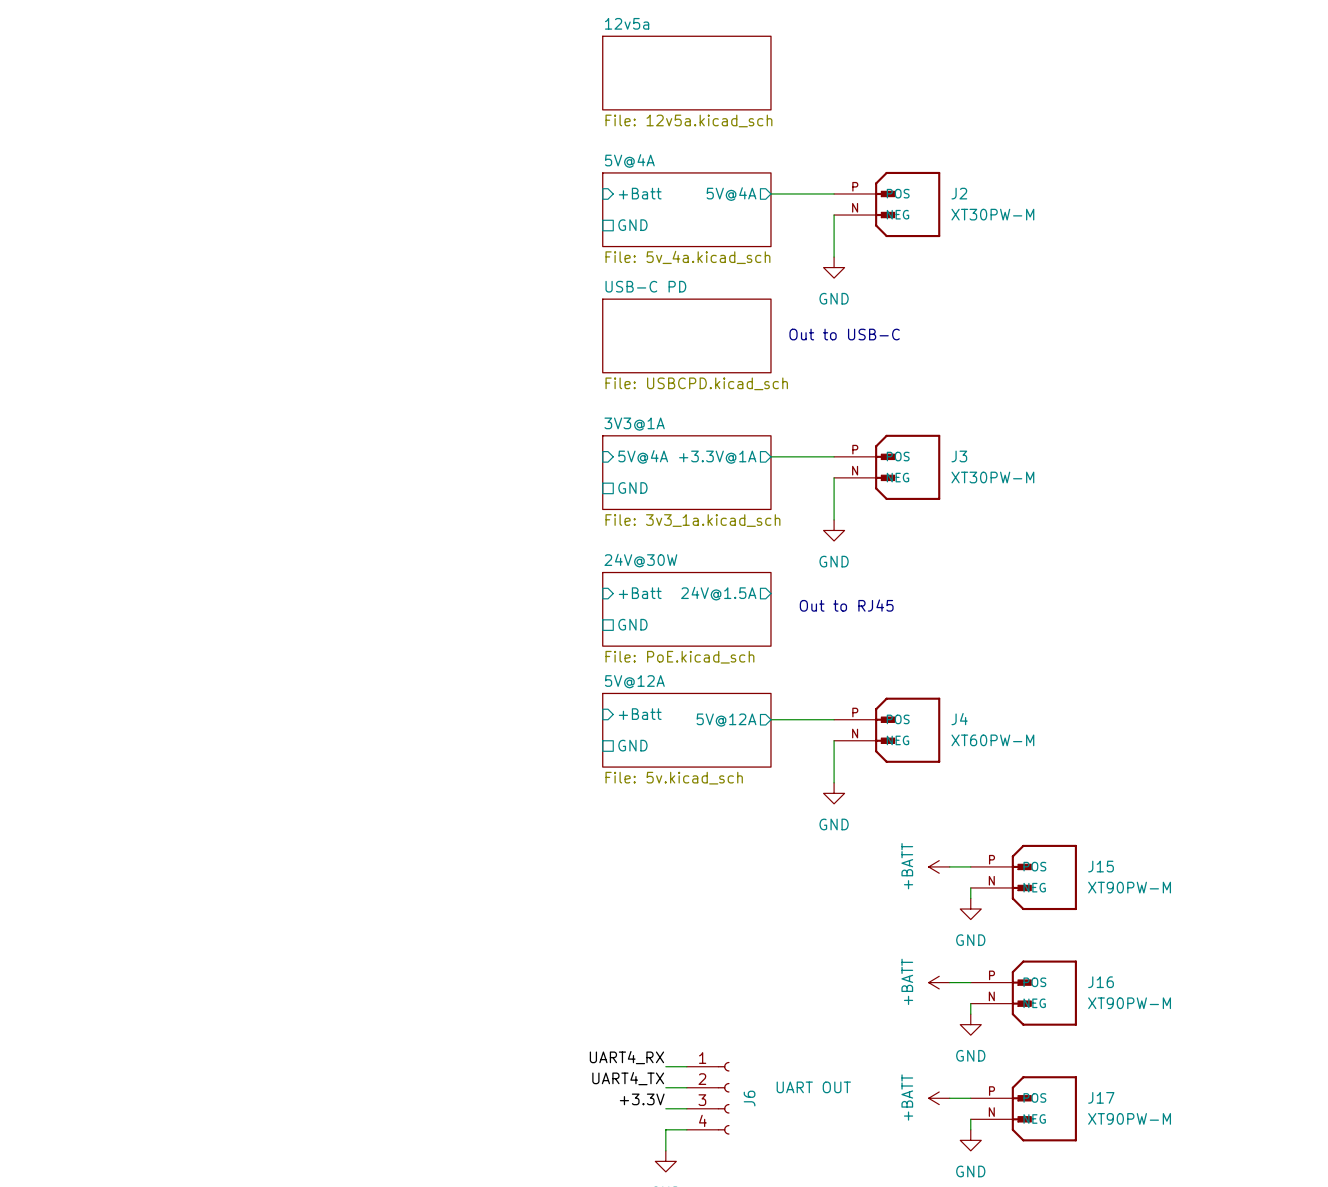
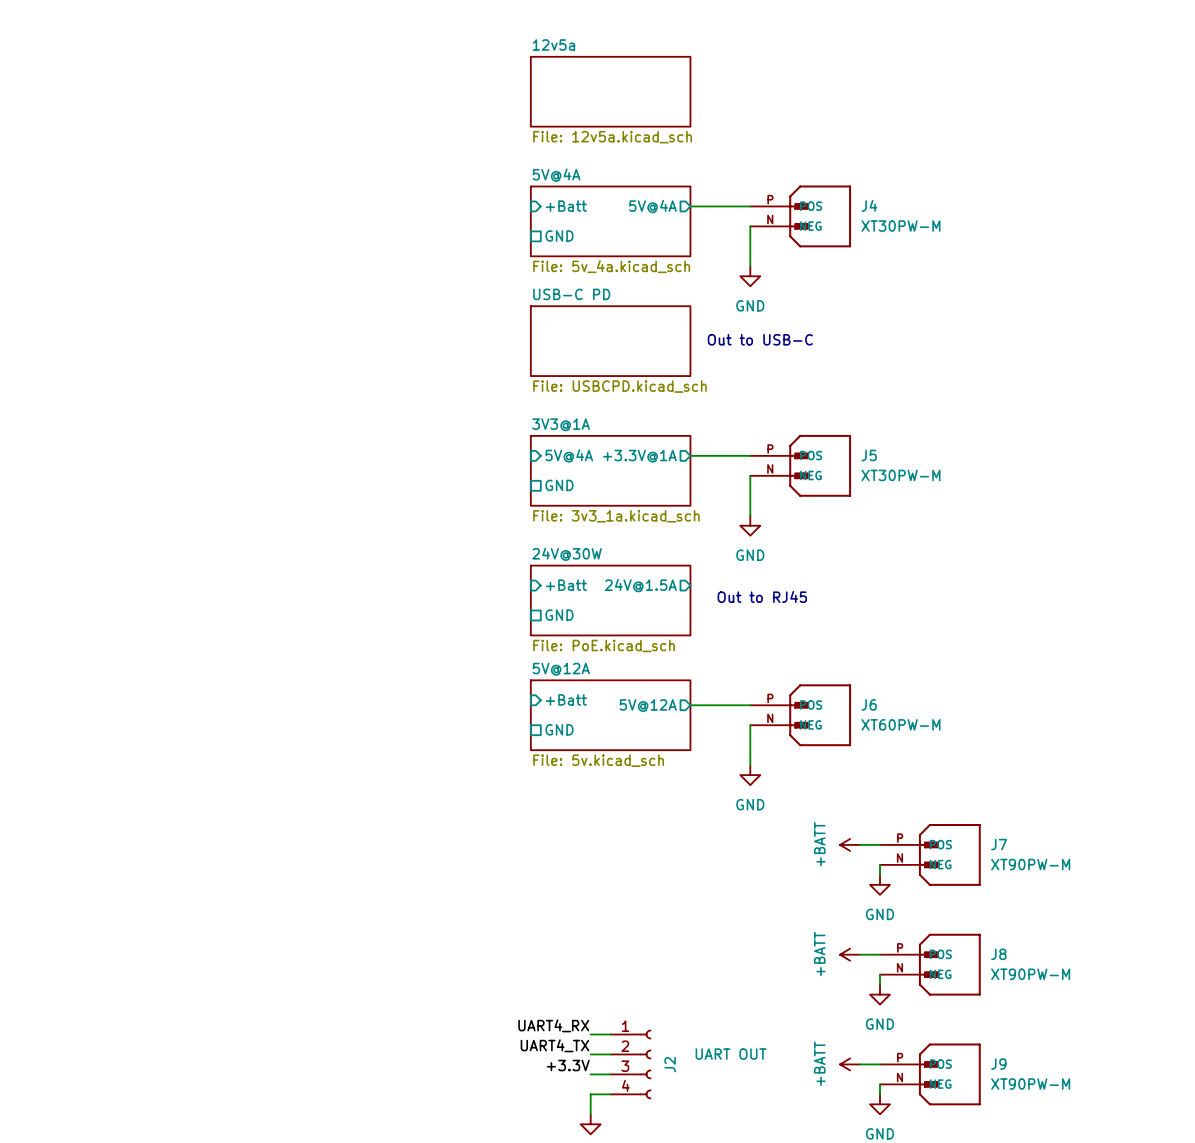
J2 name: J2 (959, 193) -> J4 (869, 205)
J3 name: J3 (959, 456) -> J5 (869, 455)
J4 name: J4 (959, 719) -> J6 (869, 704)
J15 name: J15 (1101, 866) -> J7 (999, 844)
J16 name: J16 (1101, 982) -> J8 (998, 954)
J17 name: J17 (1101, 1097) -> J9 (998, 1064)
J6 name: J6 (749, 1098) -> J2 (670, 1064)

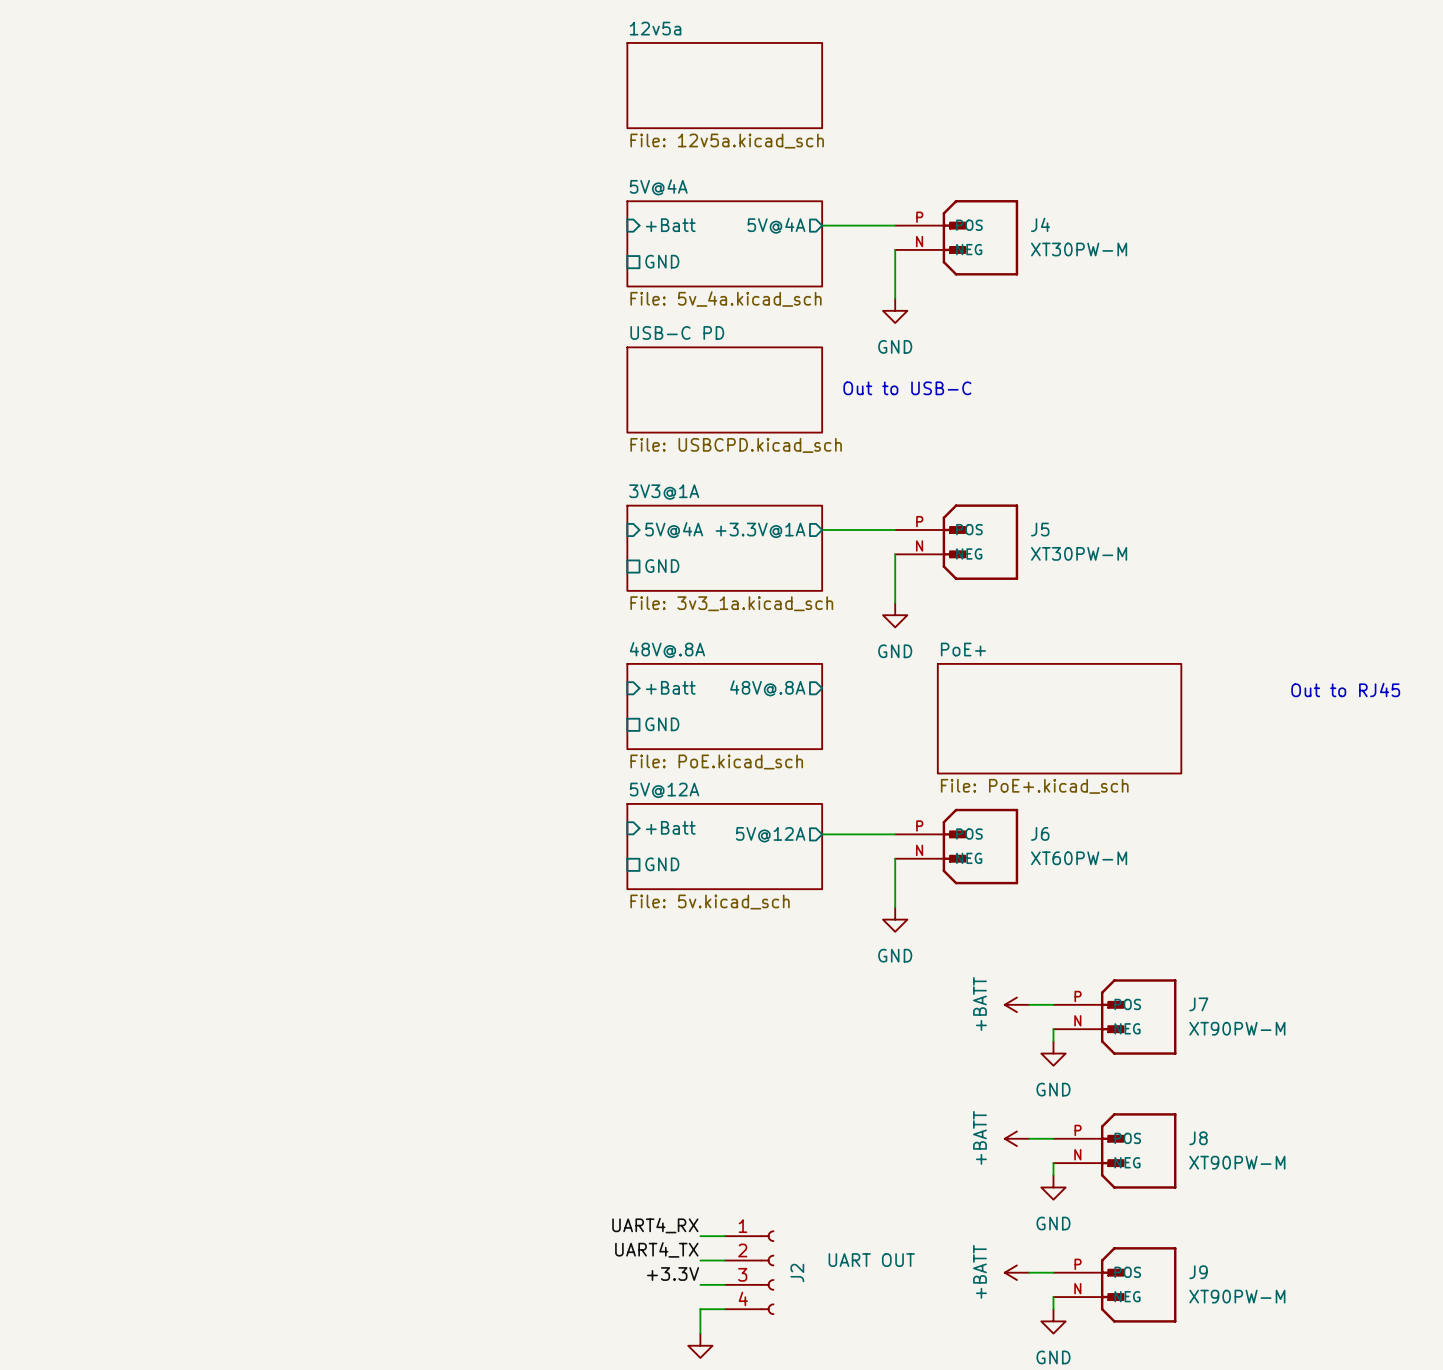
sheet 24V@30W name: 24V@30W (567, 554) -> 48V@.8A (667, 650)
sheet pin: 24V@1.5A (640, 585) -> 48V@.8A (767, 688)
text: none -> Out to RJ45 (1345, 690)
text: Out to RJ45 (762, 596) -> none
sheet PoE+: none -> File: PoE+.kicad_sch (1059, 718)

